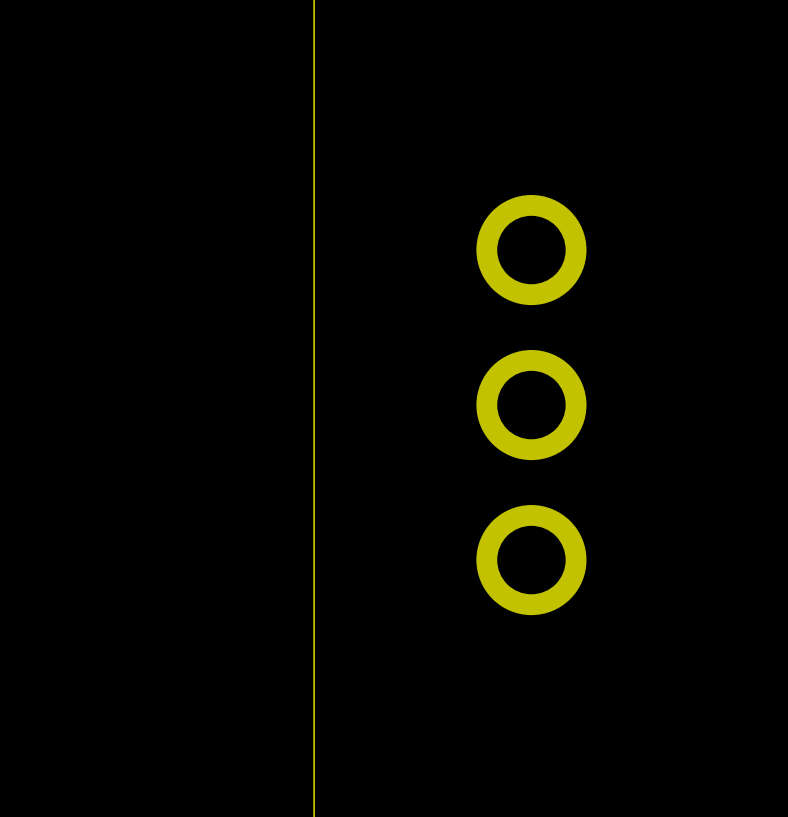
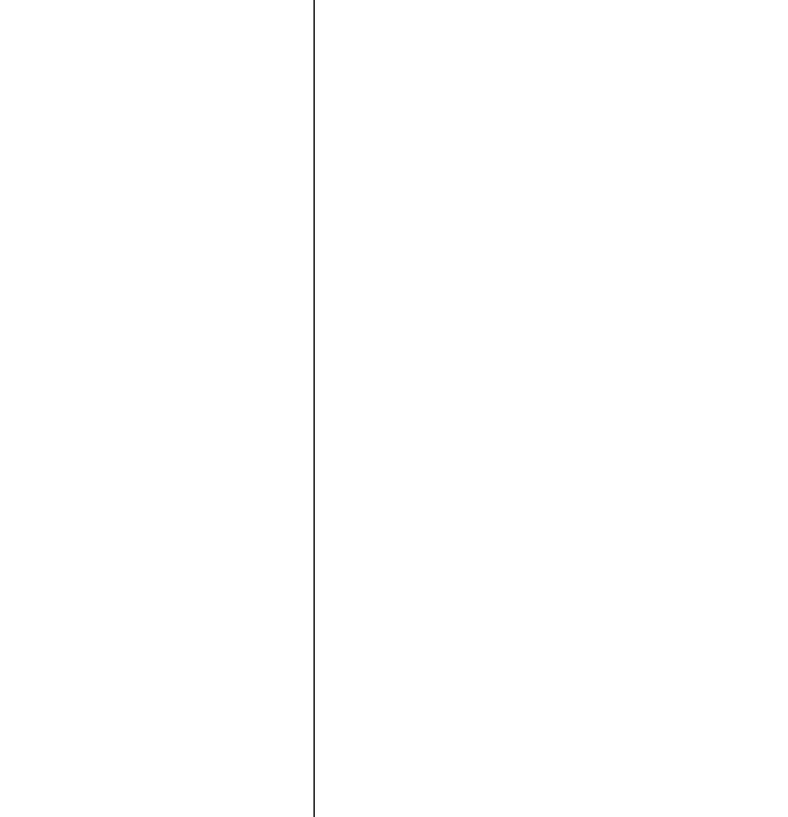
part: (531, 405) -> none

